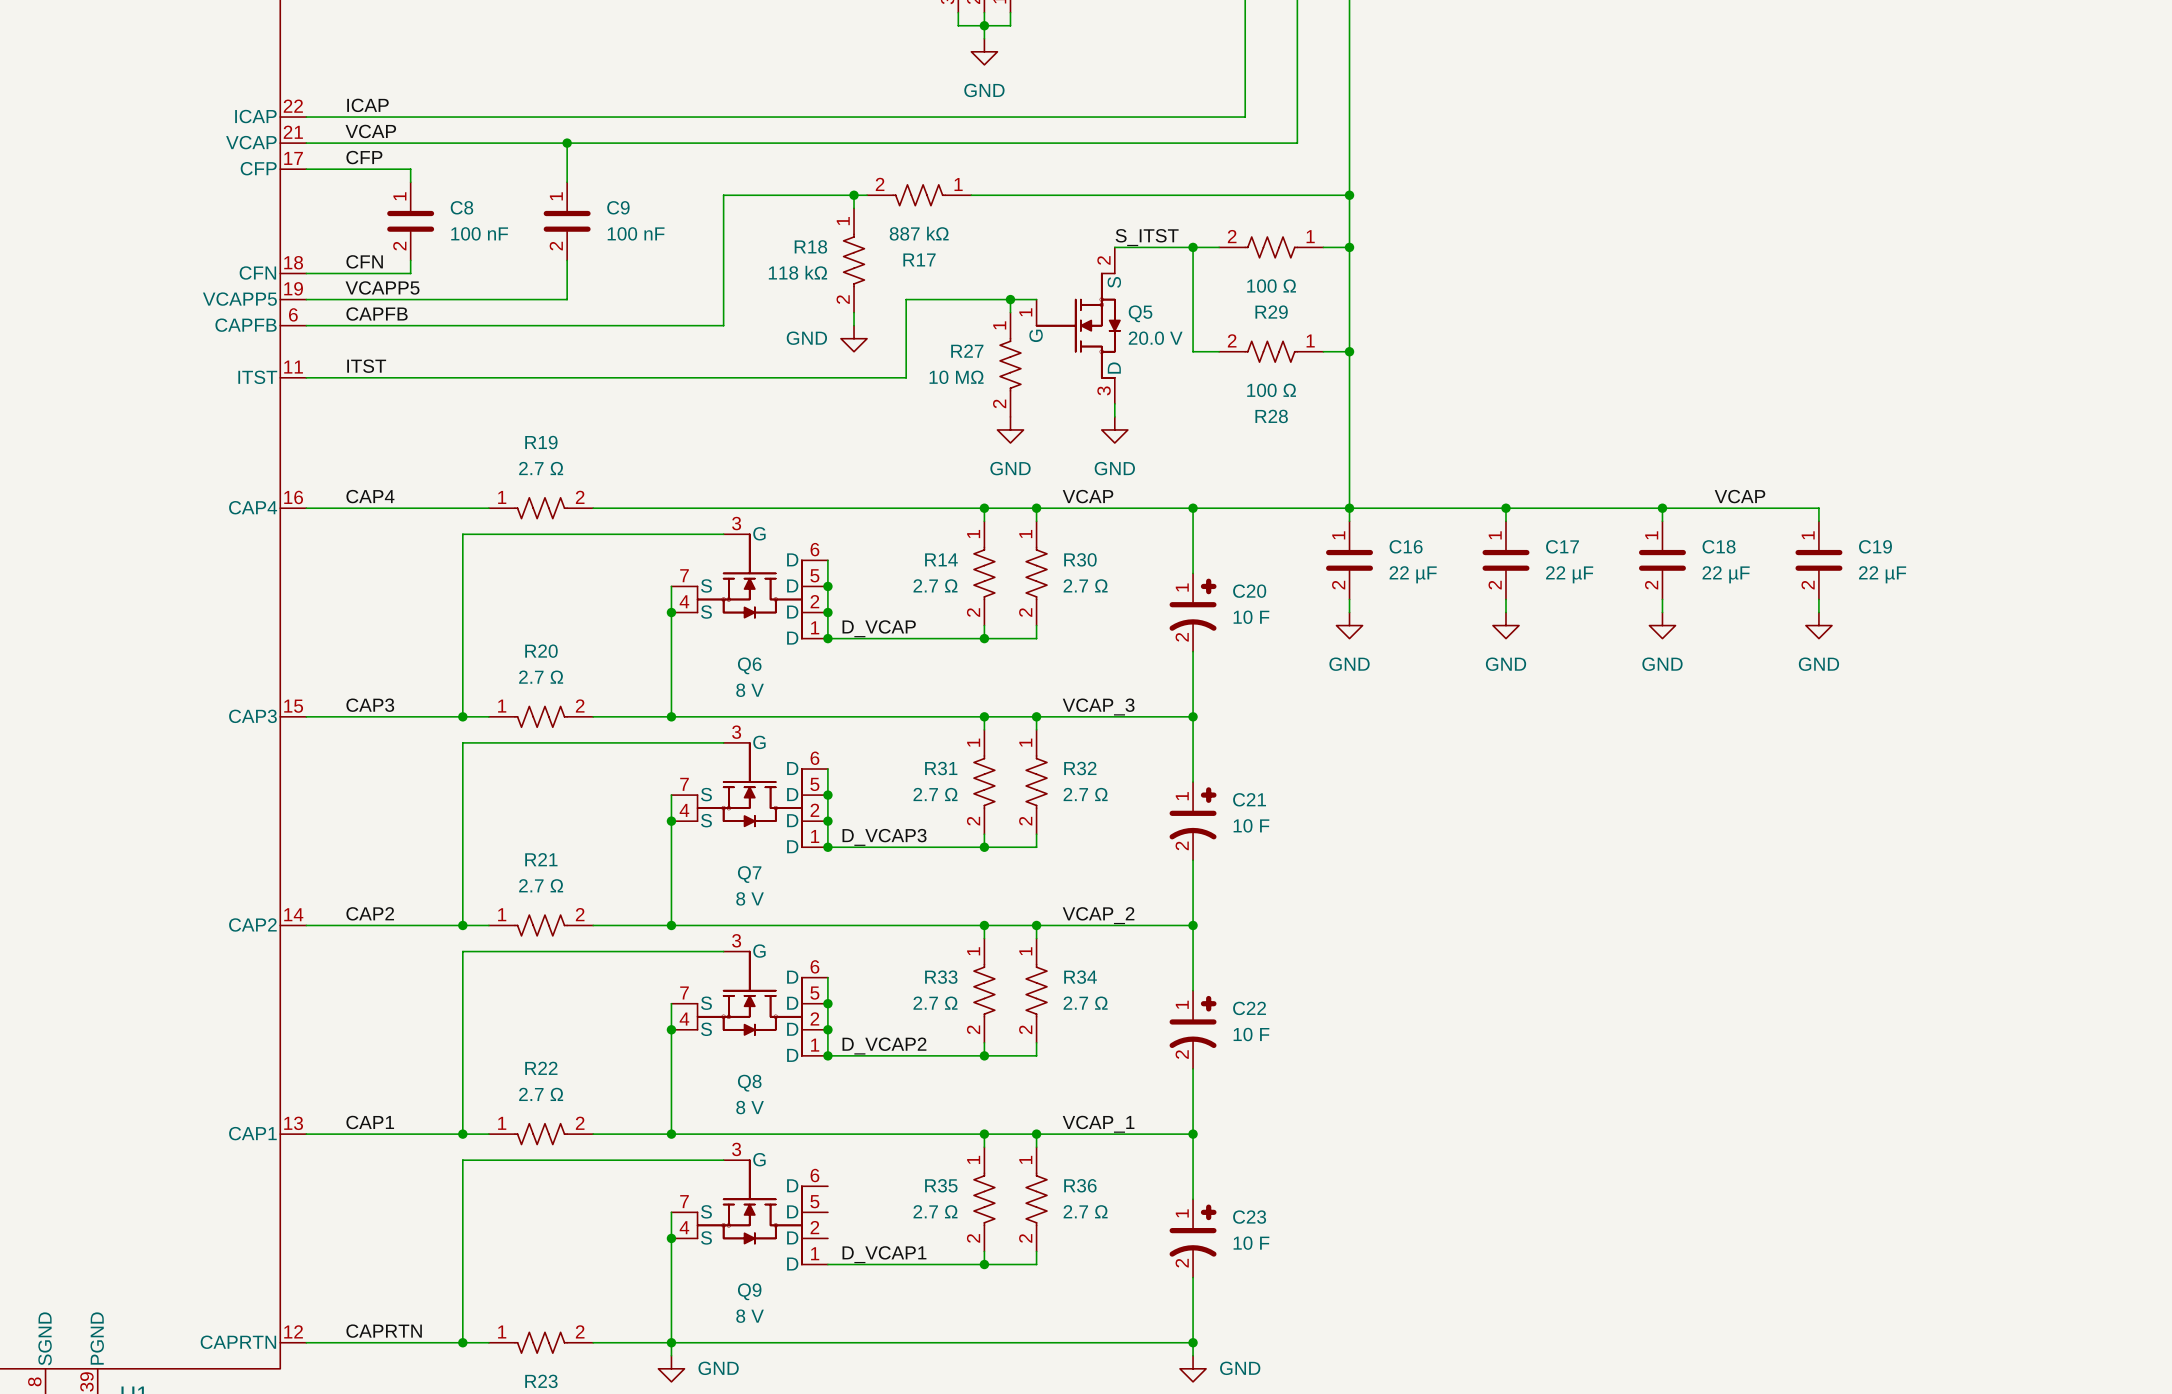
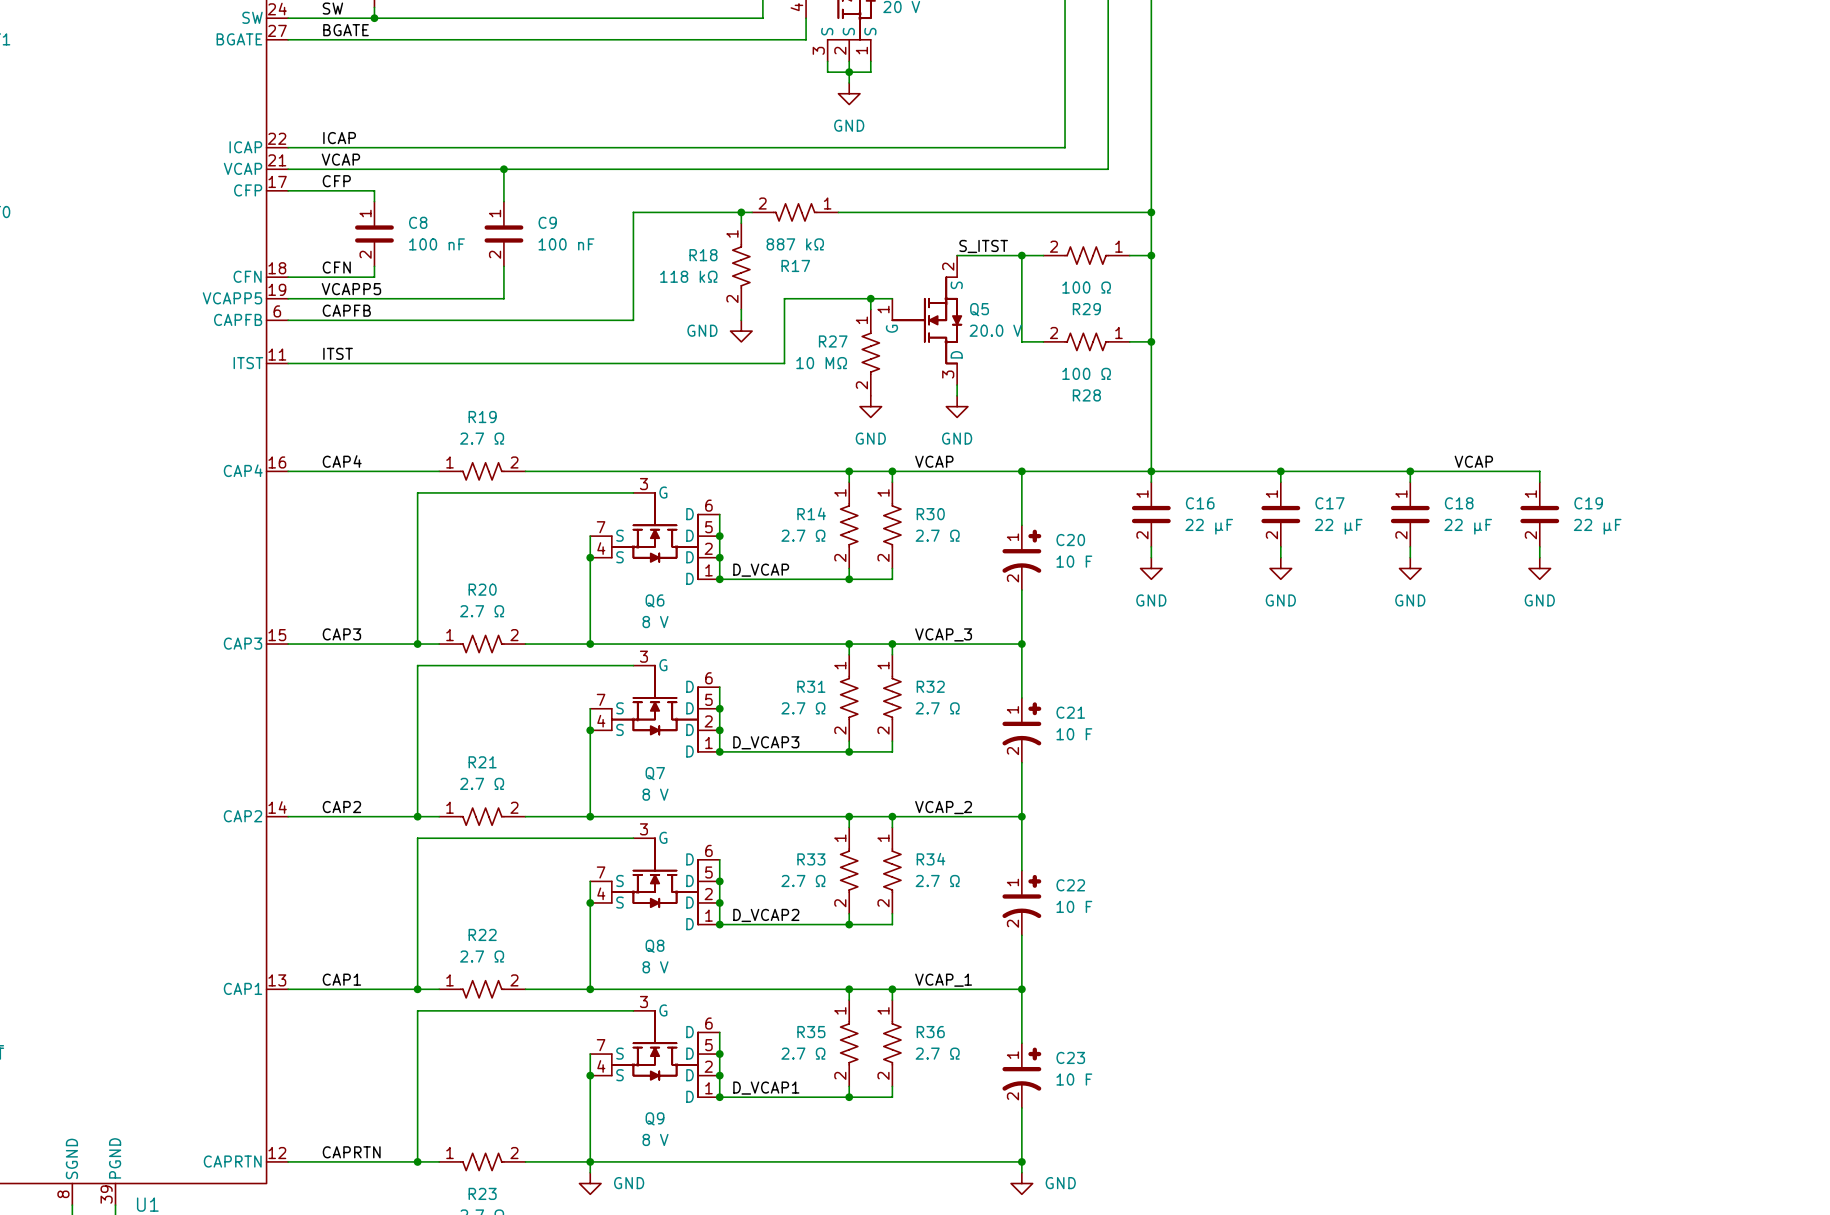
wire: none -> (719, 1032) (719, 1097)
junction: none -> (719, 1054)
junction: none -> (719, 1075)
junction: none -> (719, 1097)

